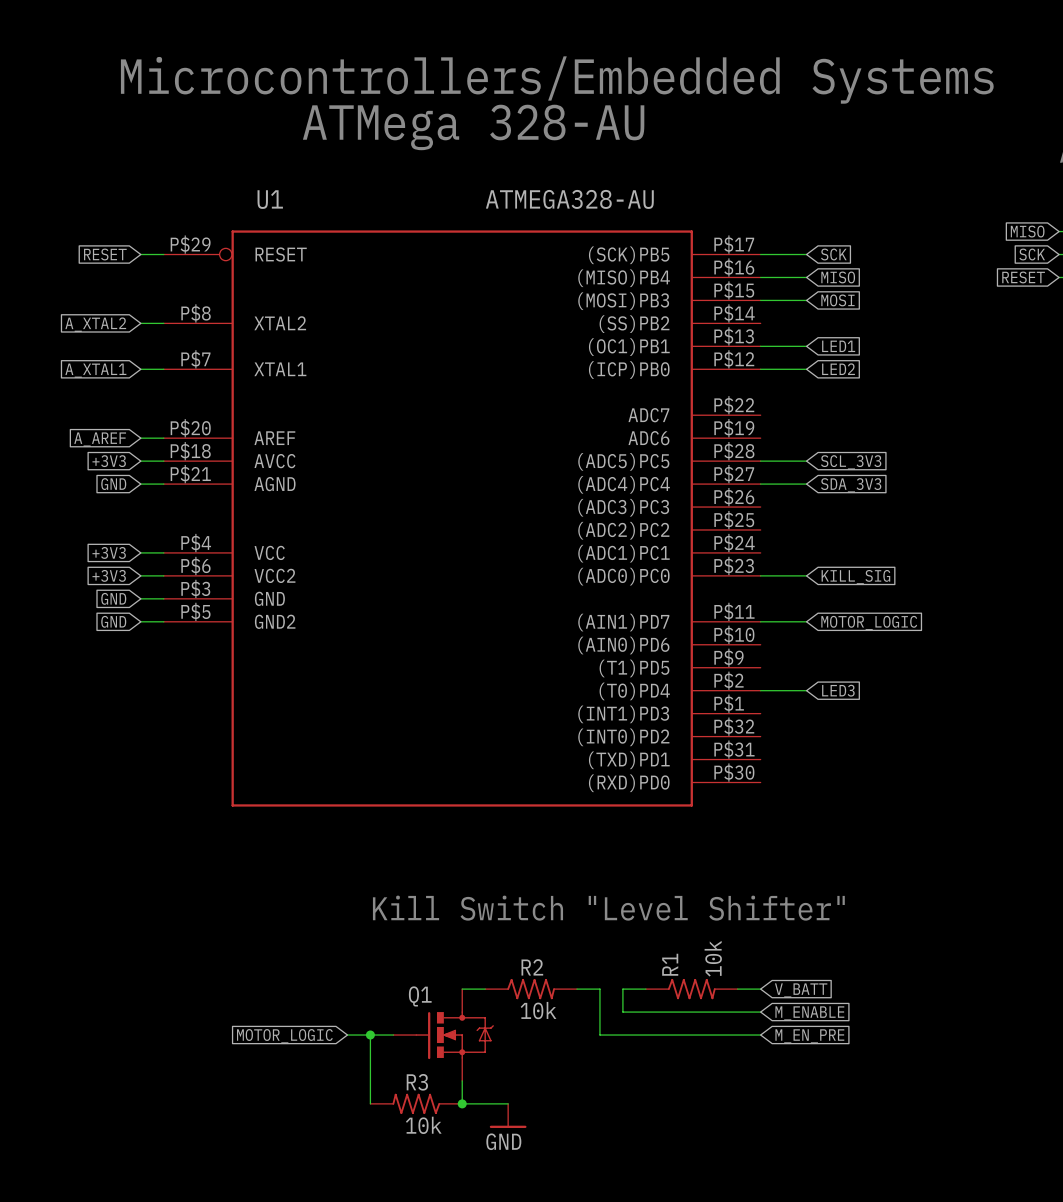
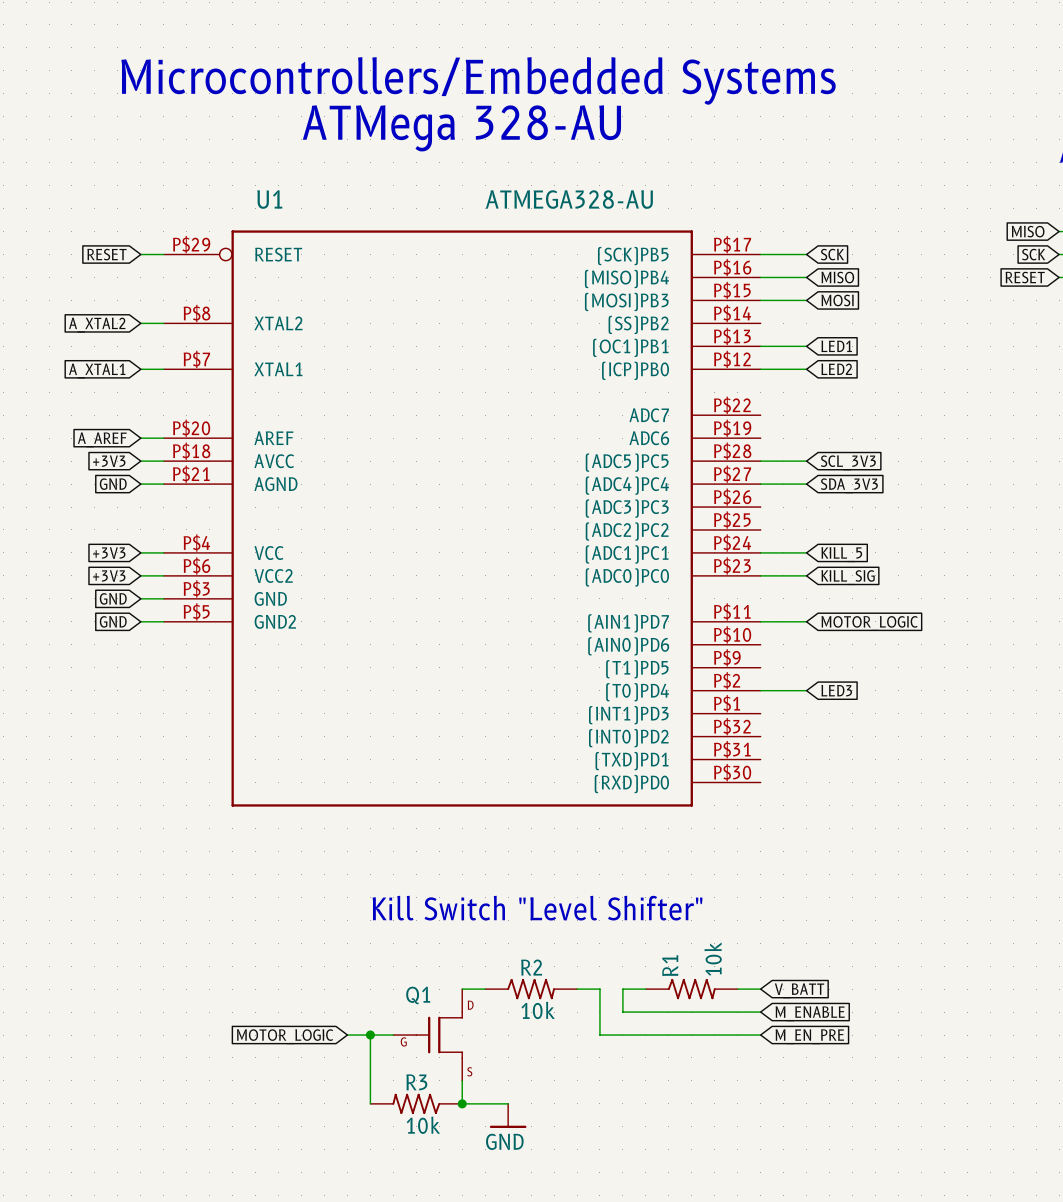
wire: none -> (760, 552) (806, 552)
global label: none -> KILL_5 (841, 554)
Q1 symbol: [393, 989, 494, 1081] -> [393, 989, 463, 1081]

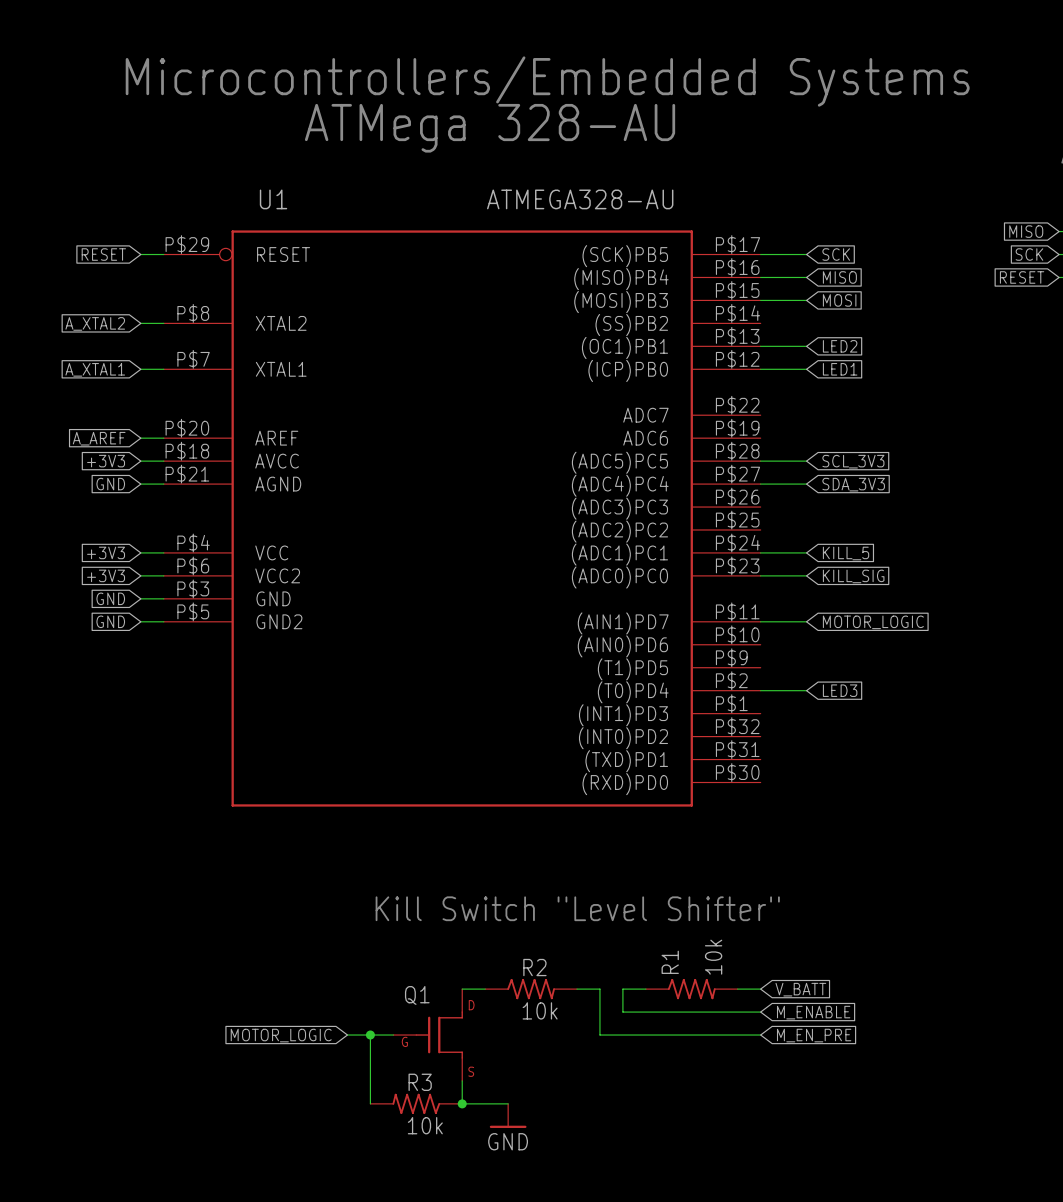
global label: LED1 (836, 346) -> LED2 (840, 346)
global label: LED2 (836, 369) -> LED1 (840, 369)

